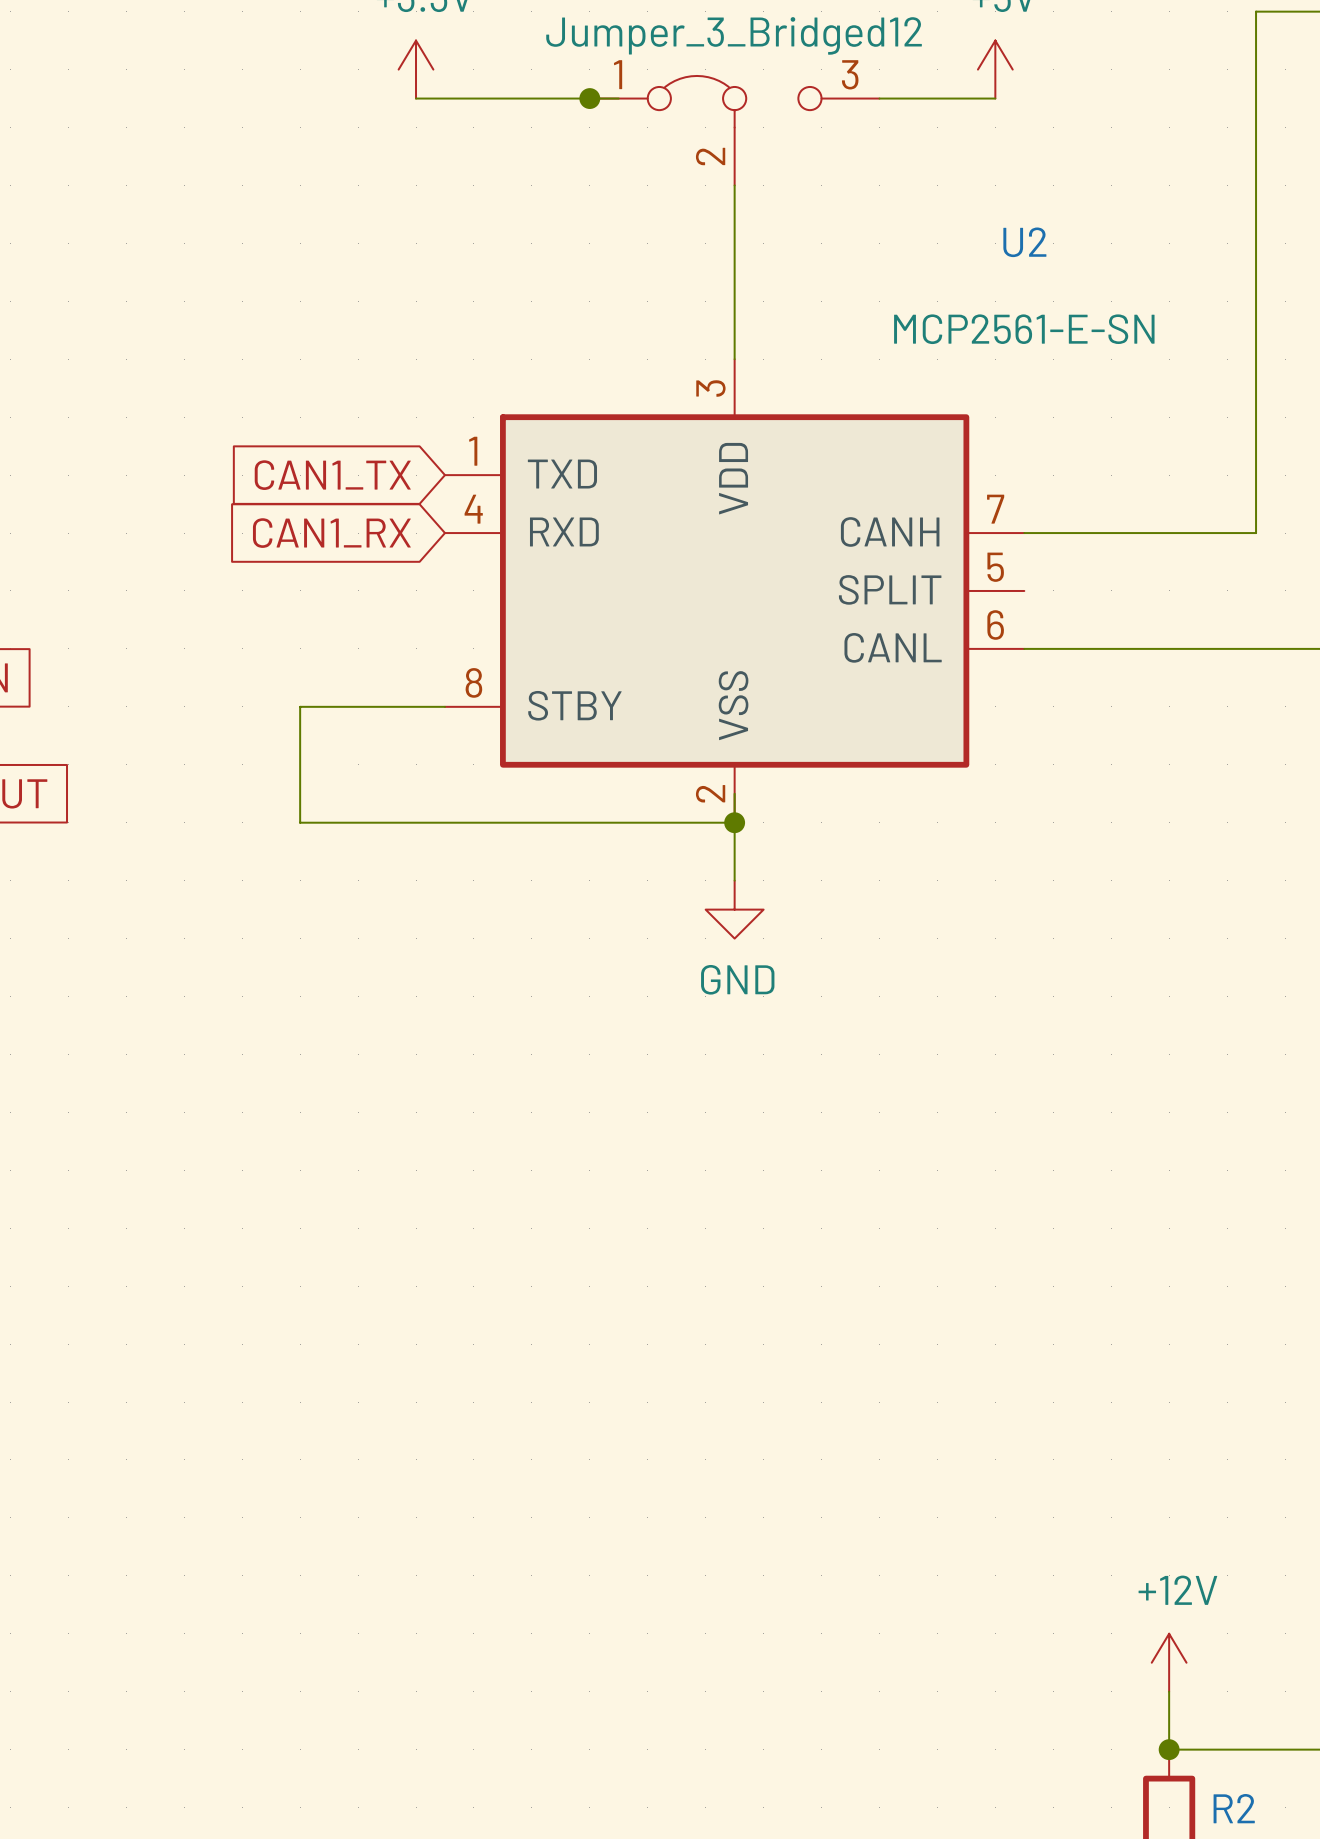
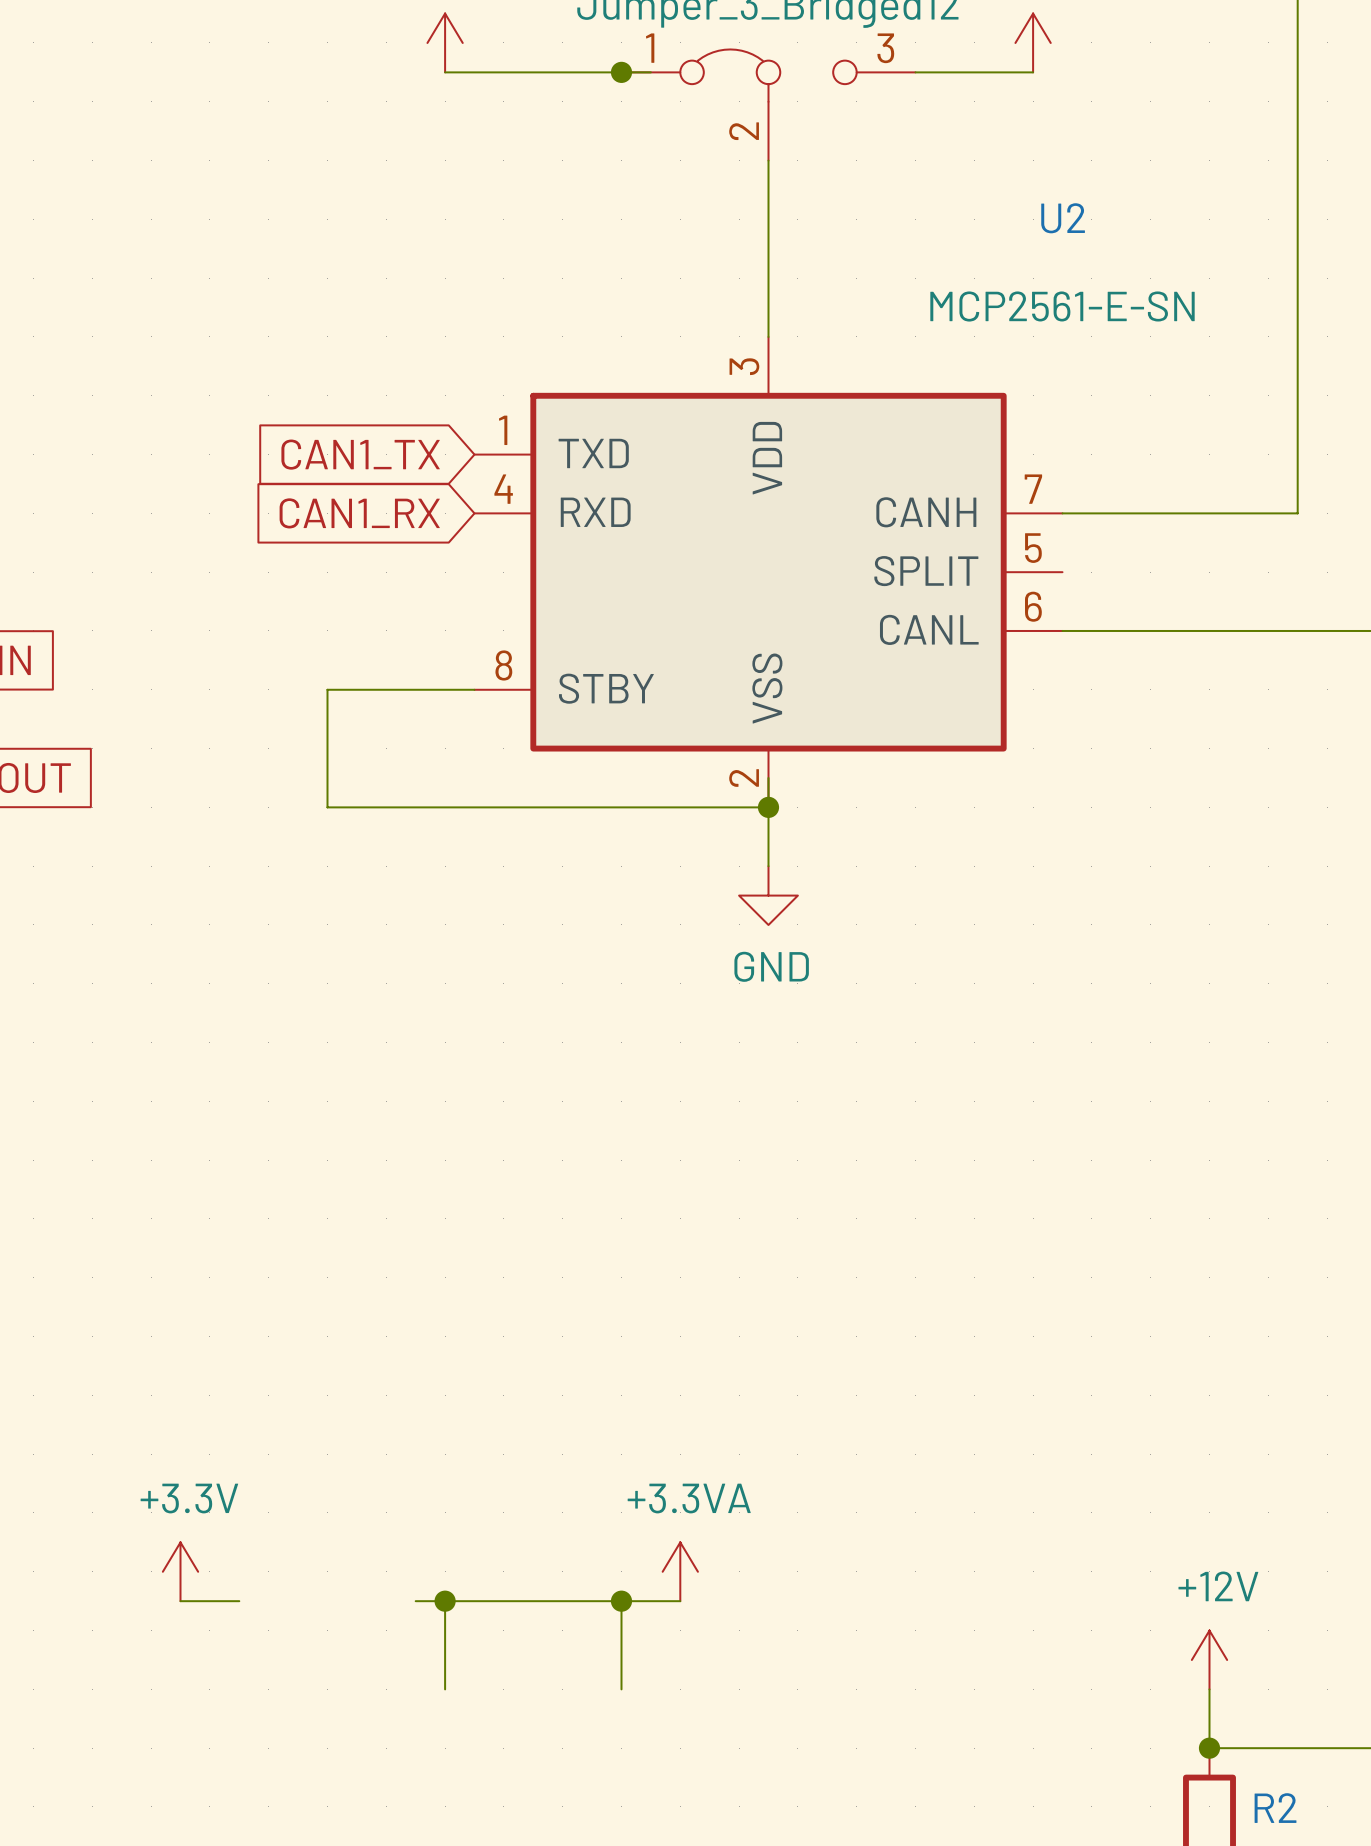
power symbol: none -> +3.3V (180, 1571)
power symbol: none -> +3.3VA (680, 1571)
wire: none -> (180, 1601) (239, 1601)
wire: none -> (415, 1601) (680, 1601)
wire: none -> (445, 1601) (445, 1689)
junction: none -> (445, 1601)
wire: none -> (621, 1601) (621, 1689)
junction: none -> (621, 1601)

